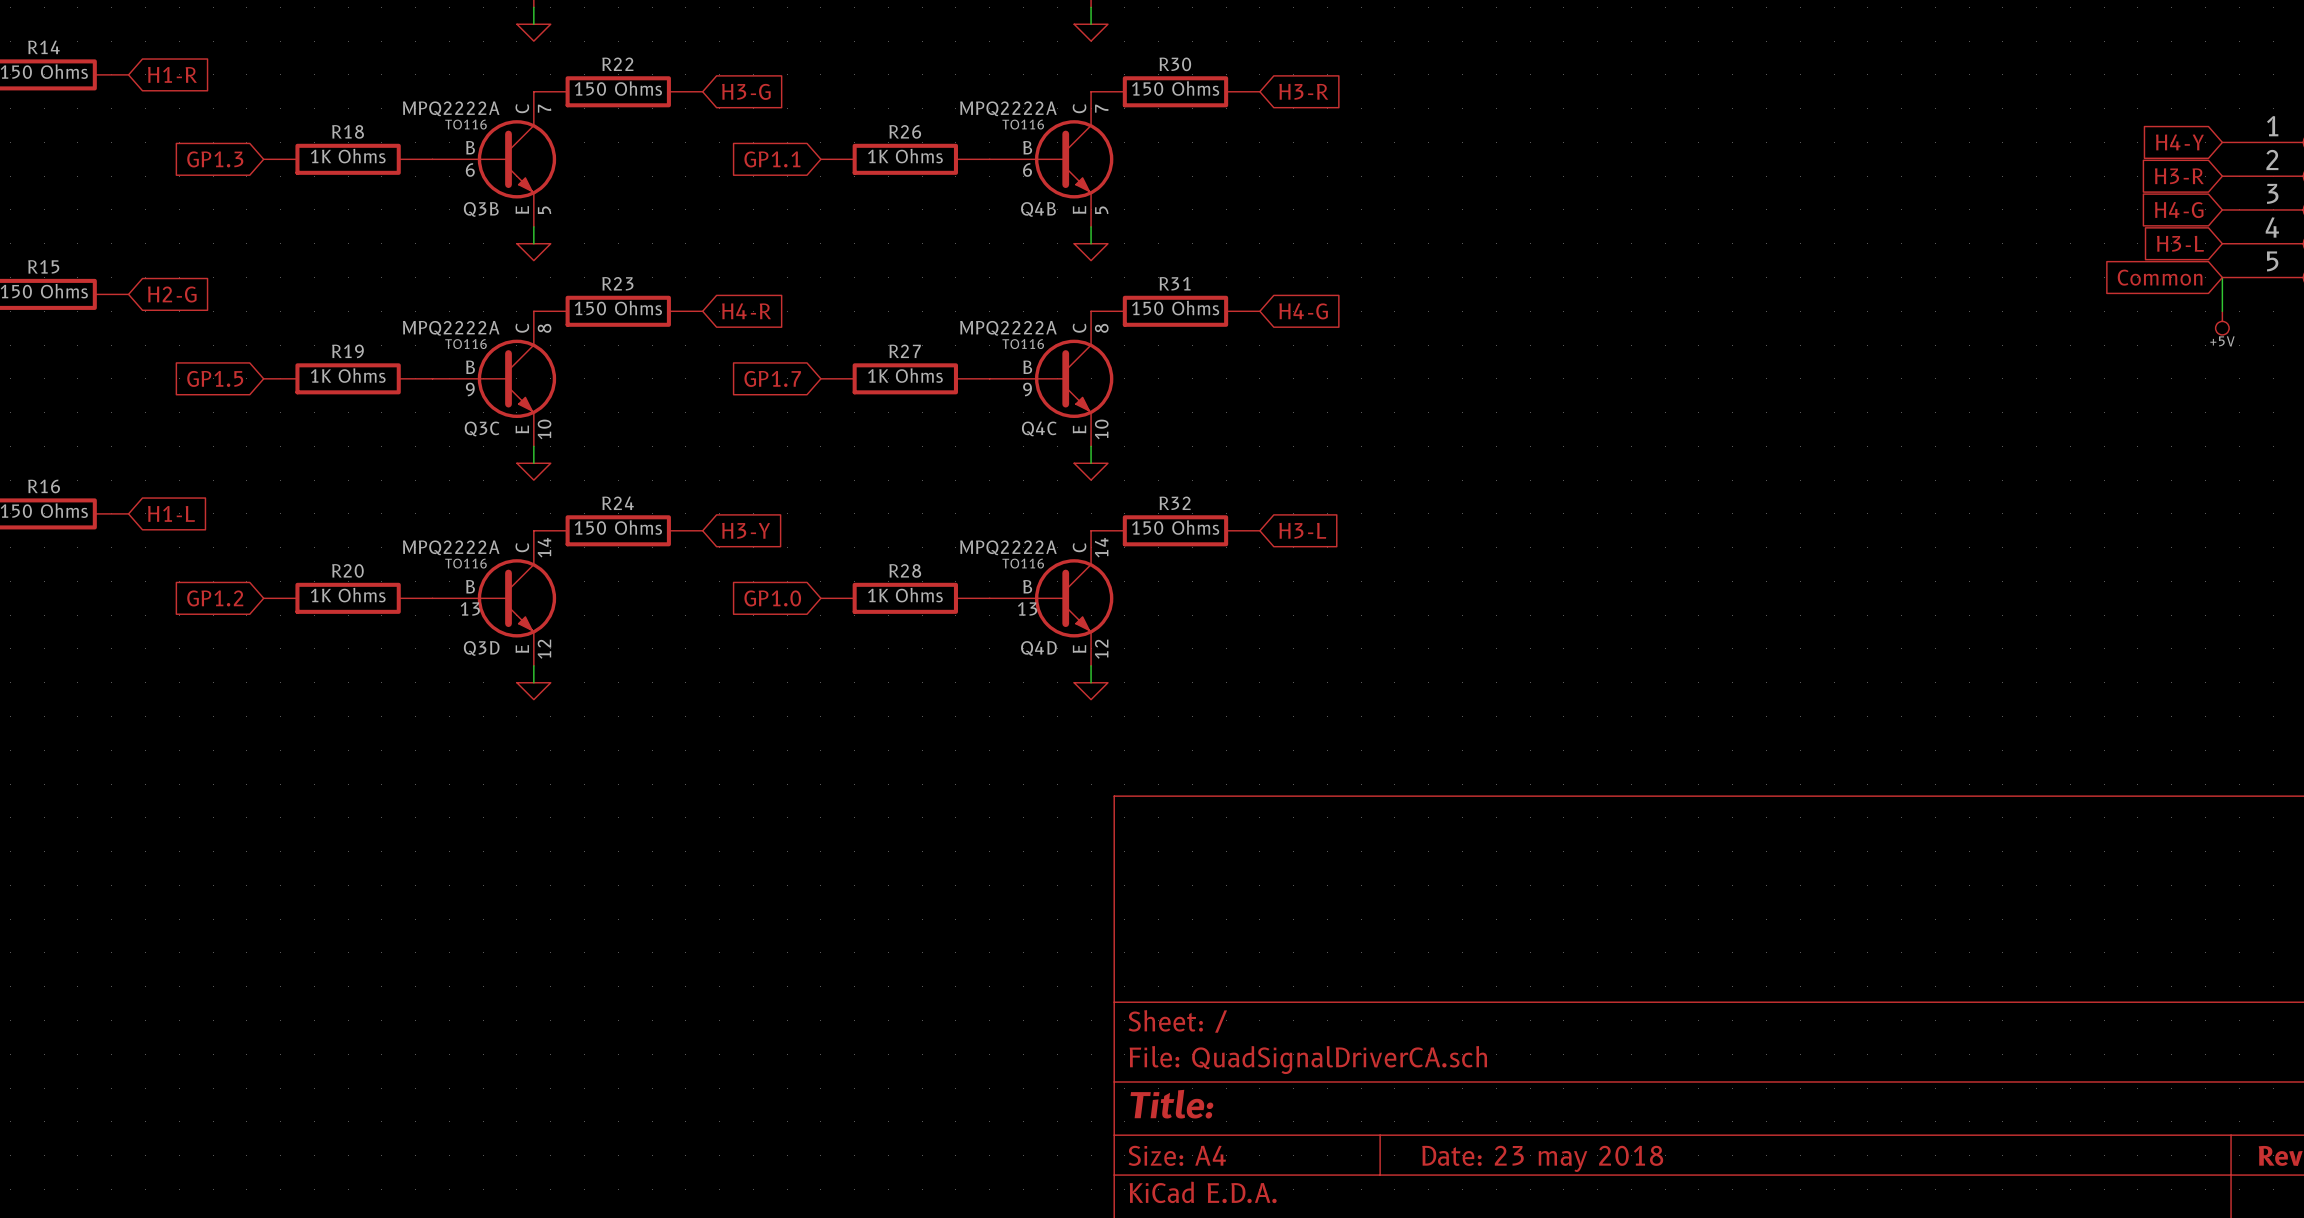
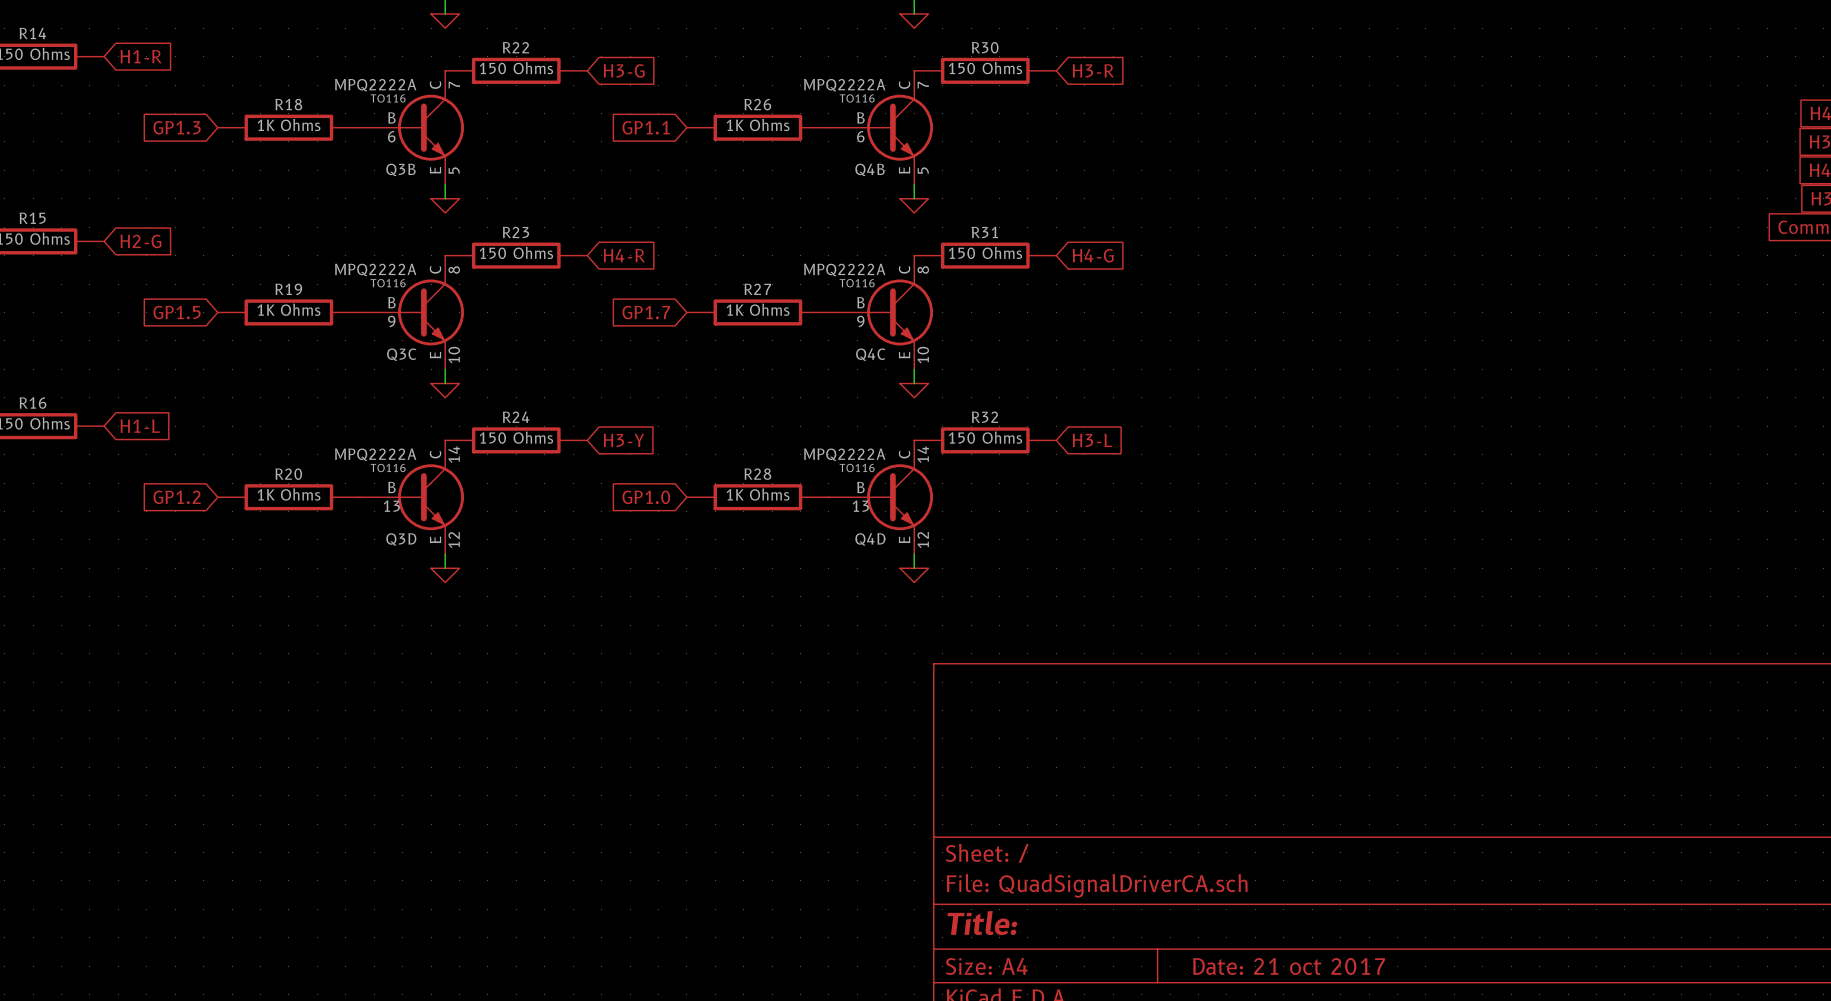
title block: Date: 23 may 2018 (1542, 1158) -> Date: 21 oct 2017 (1289, 966)

